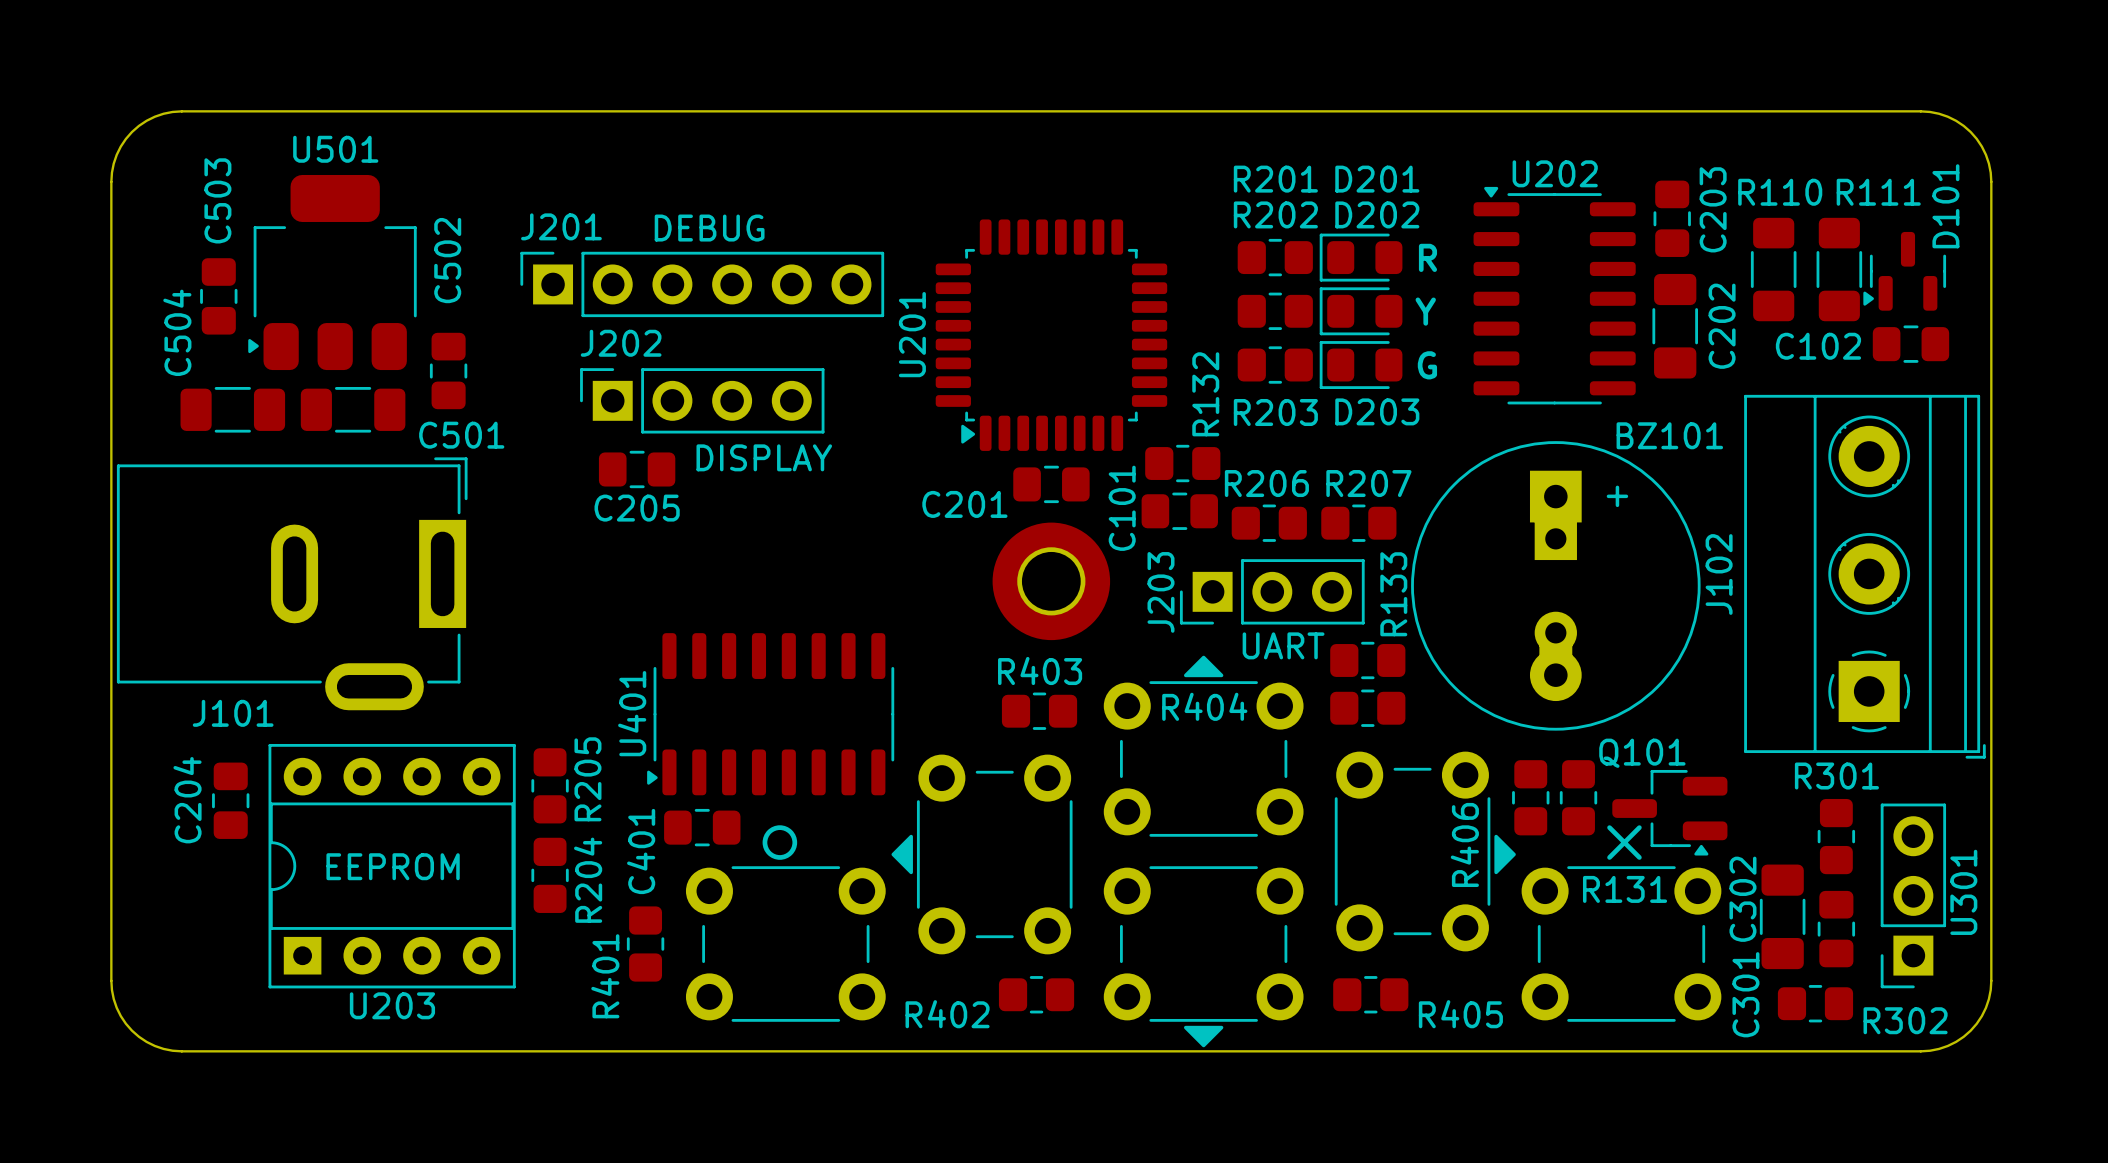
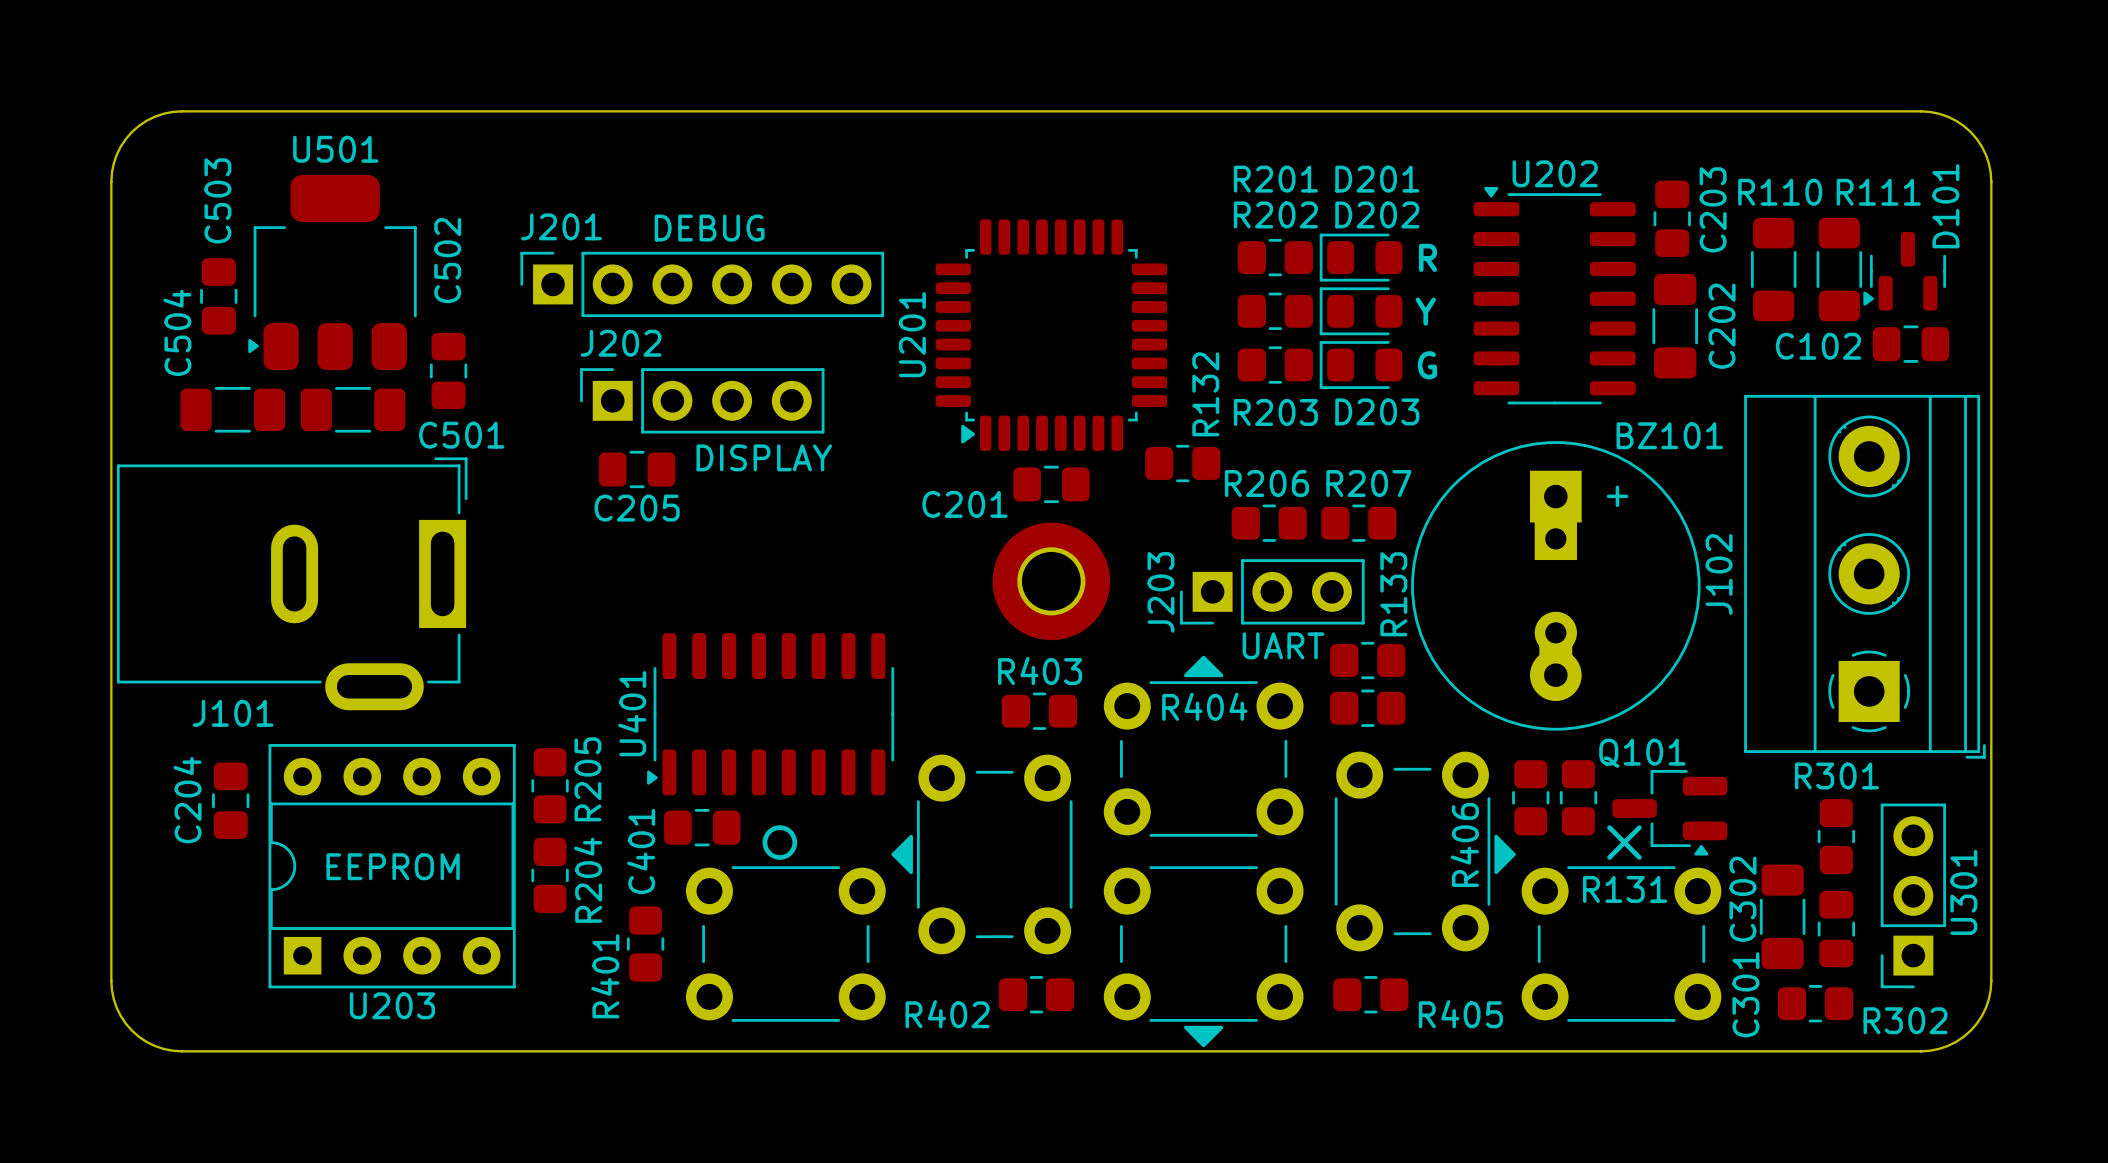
C101: (1179, 511) -> none

